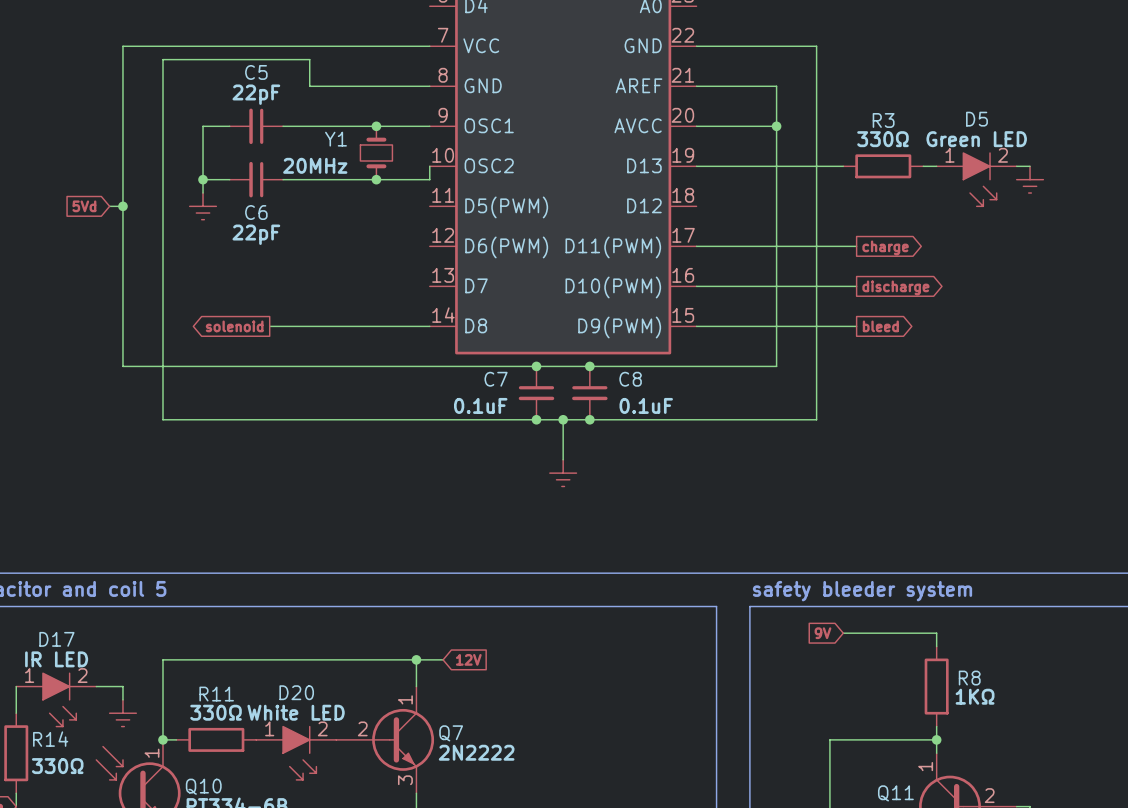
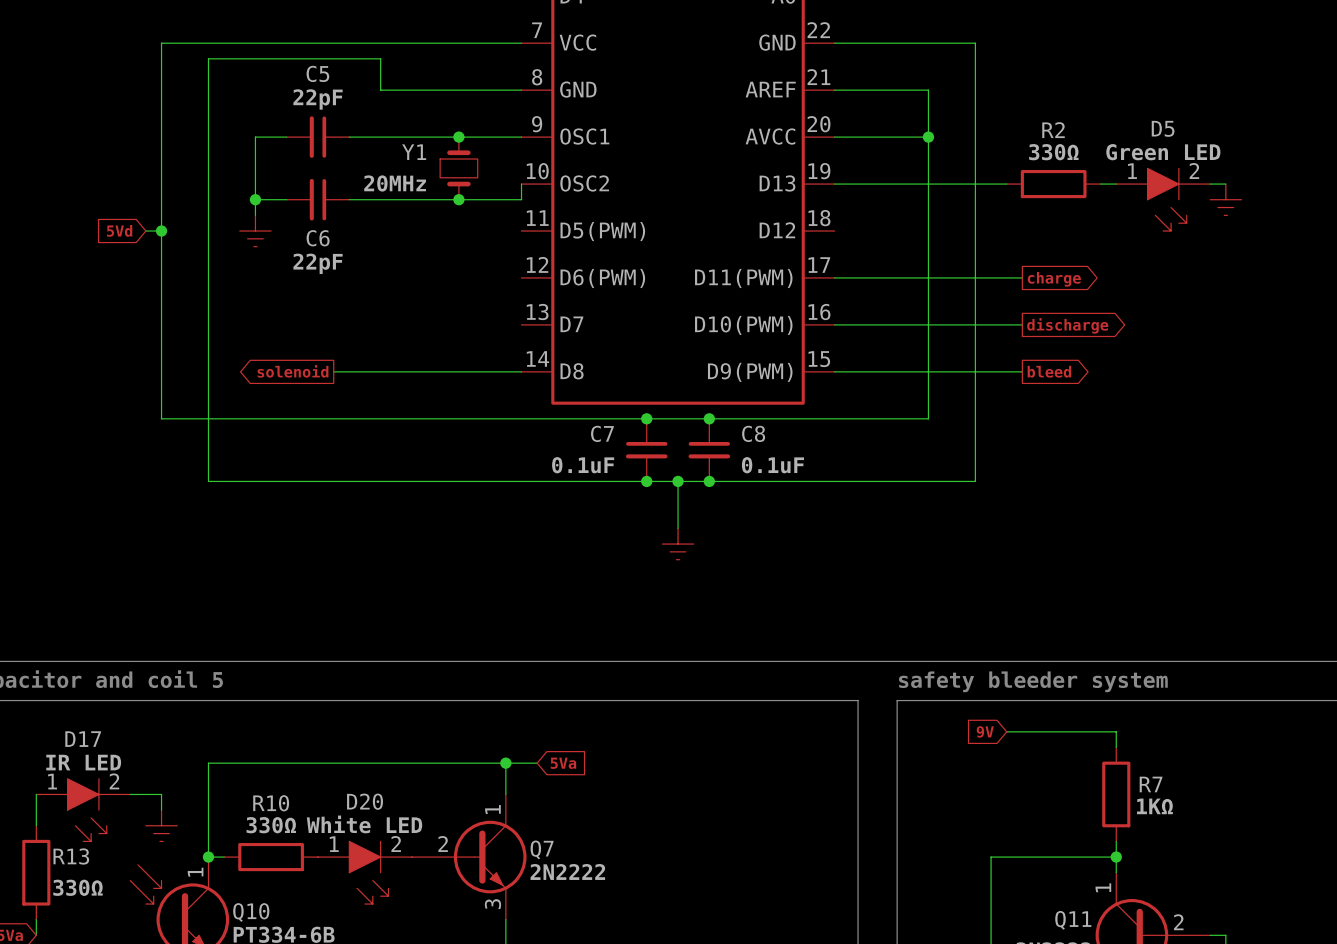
R3 name: R3 (883, 120) -> R2 (1053, 130)
global label: 12V (468, 659) -> 5Va (563, 763)
R8 name: R8 (969, 678) -> R7 (1151, 784)
R11 name: R11 (216, 694) -> R10 (271, 803)
R14 name: R14 (50, 739) -> R13 (71, 856)

